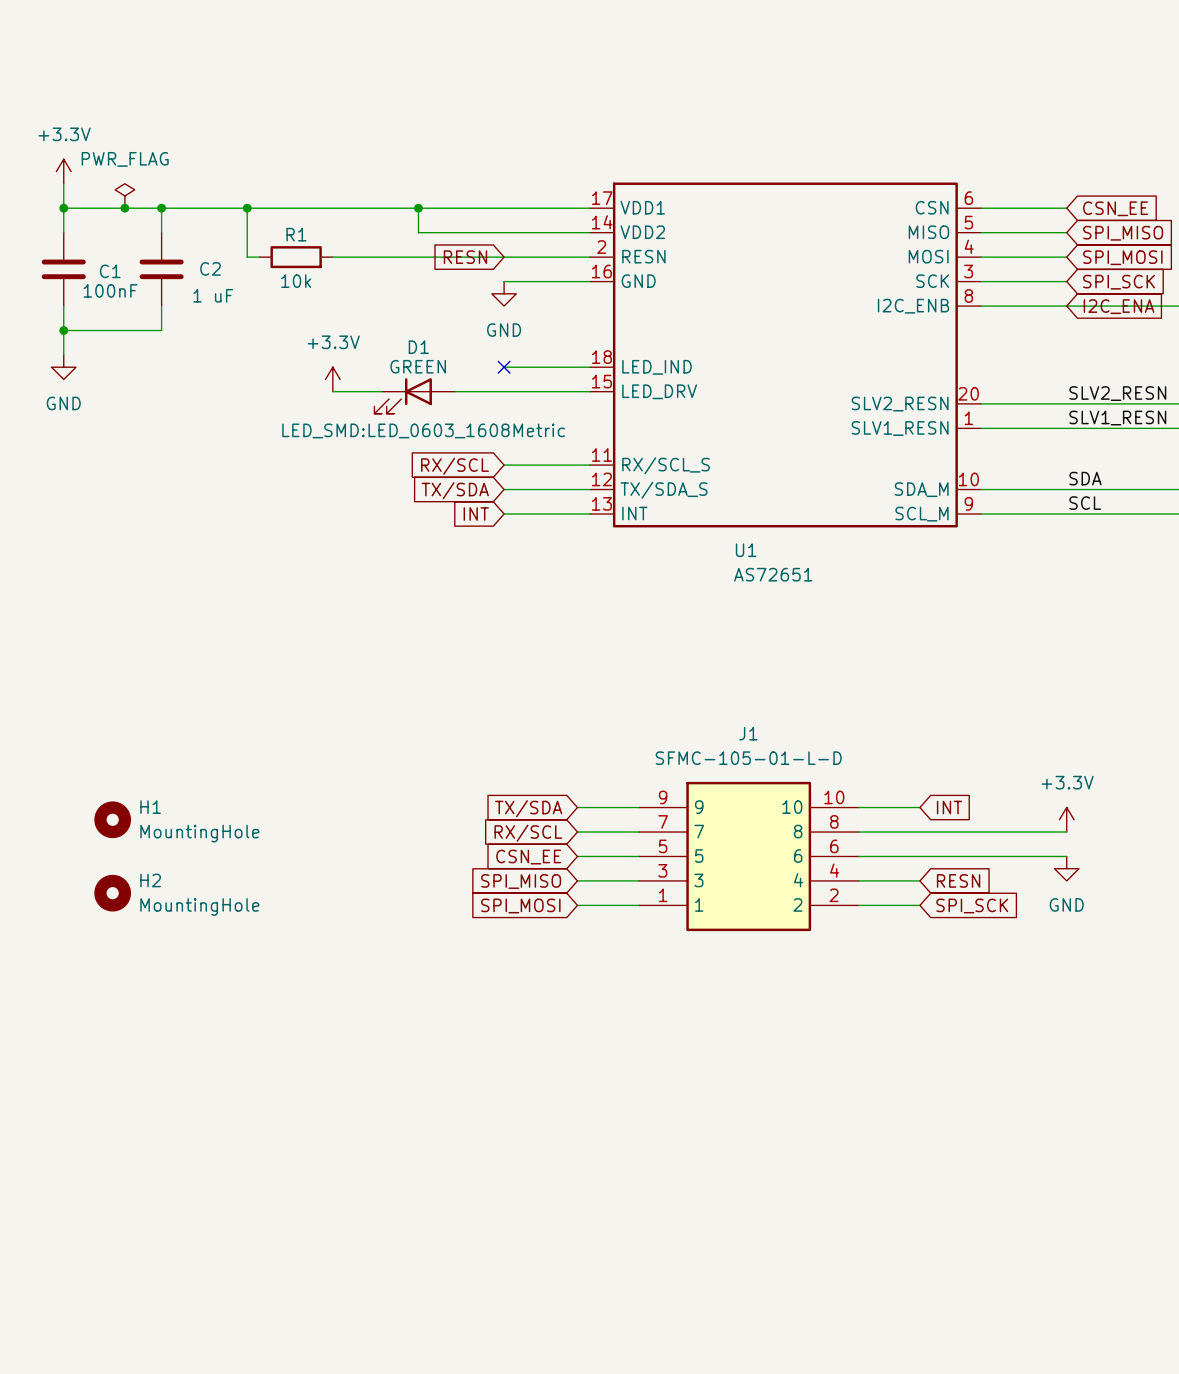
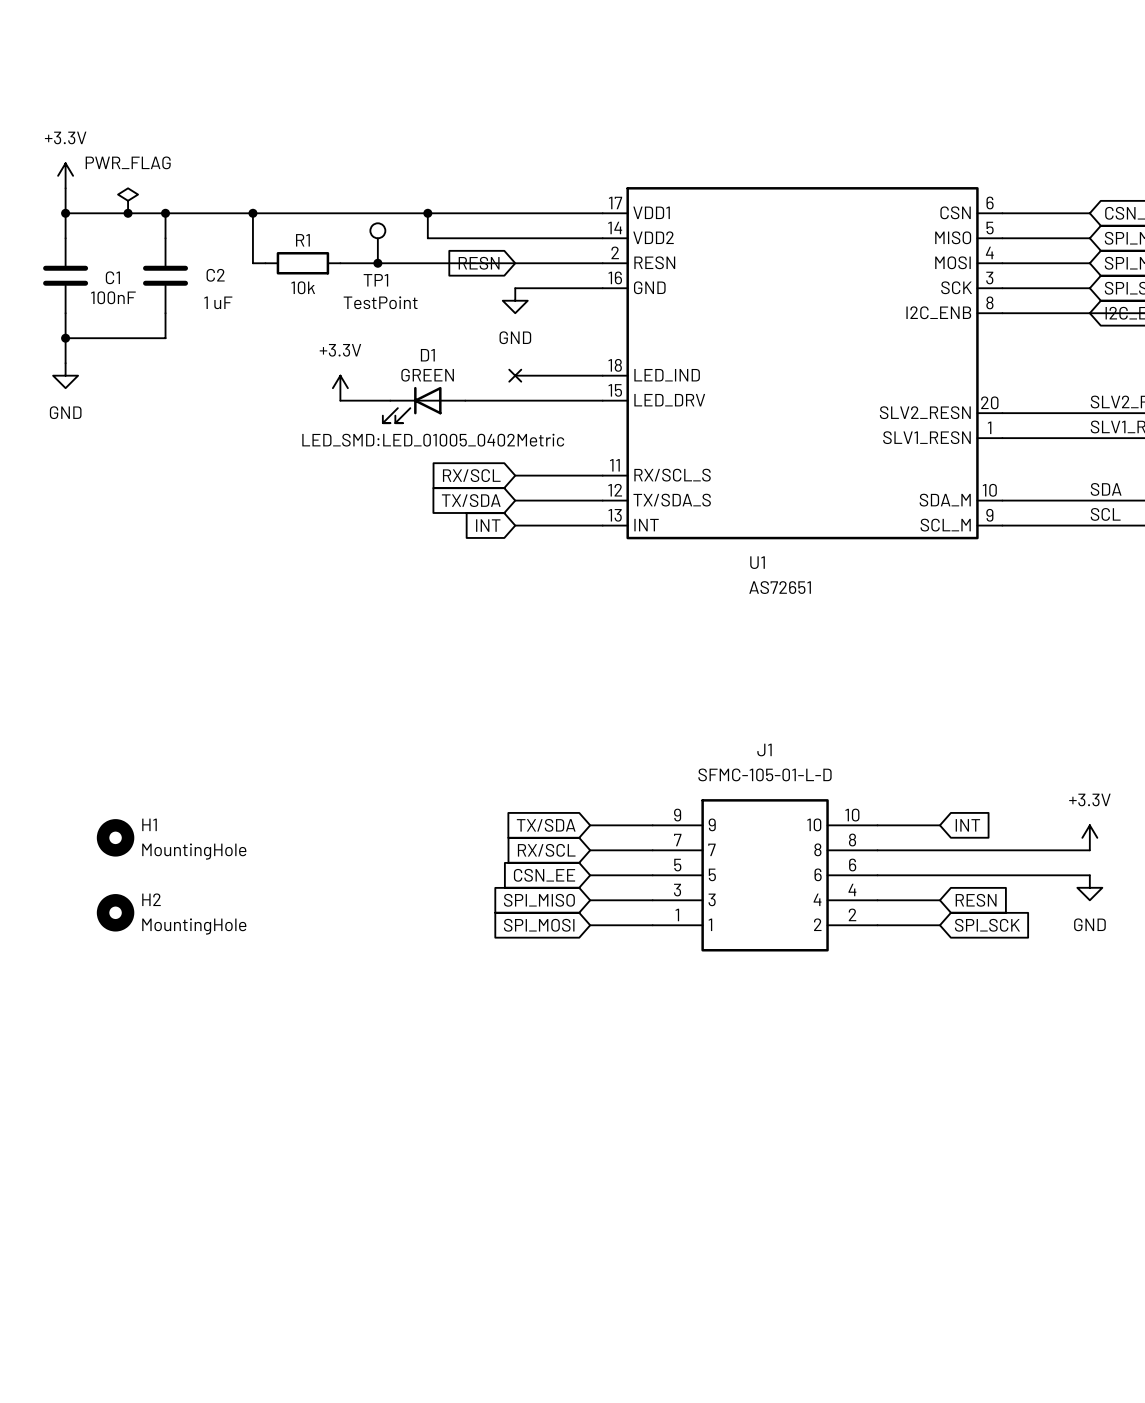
TP1: none -> TestPoint (377, 243)
junction: none -> (377, 263)
D1 text: LED_SMD:LED_0603_1608Metric (423, 430) -> LED_SMD:LED_01005_0402Metric (433, 440)

